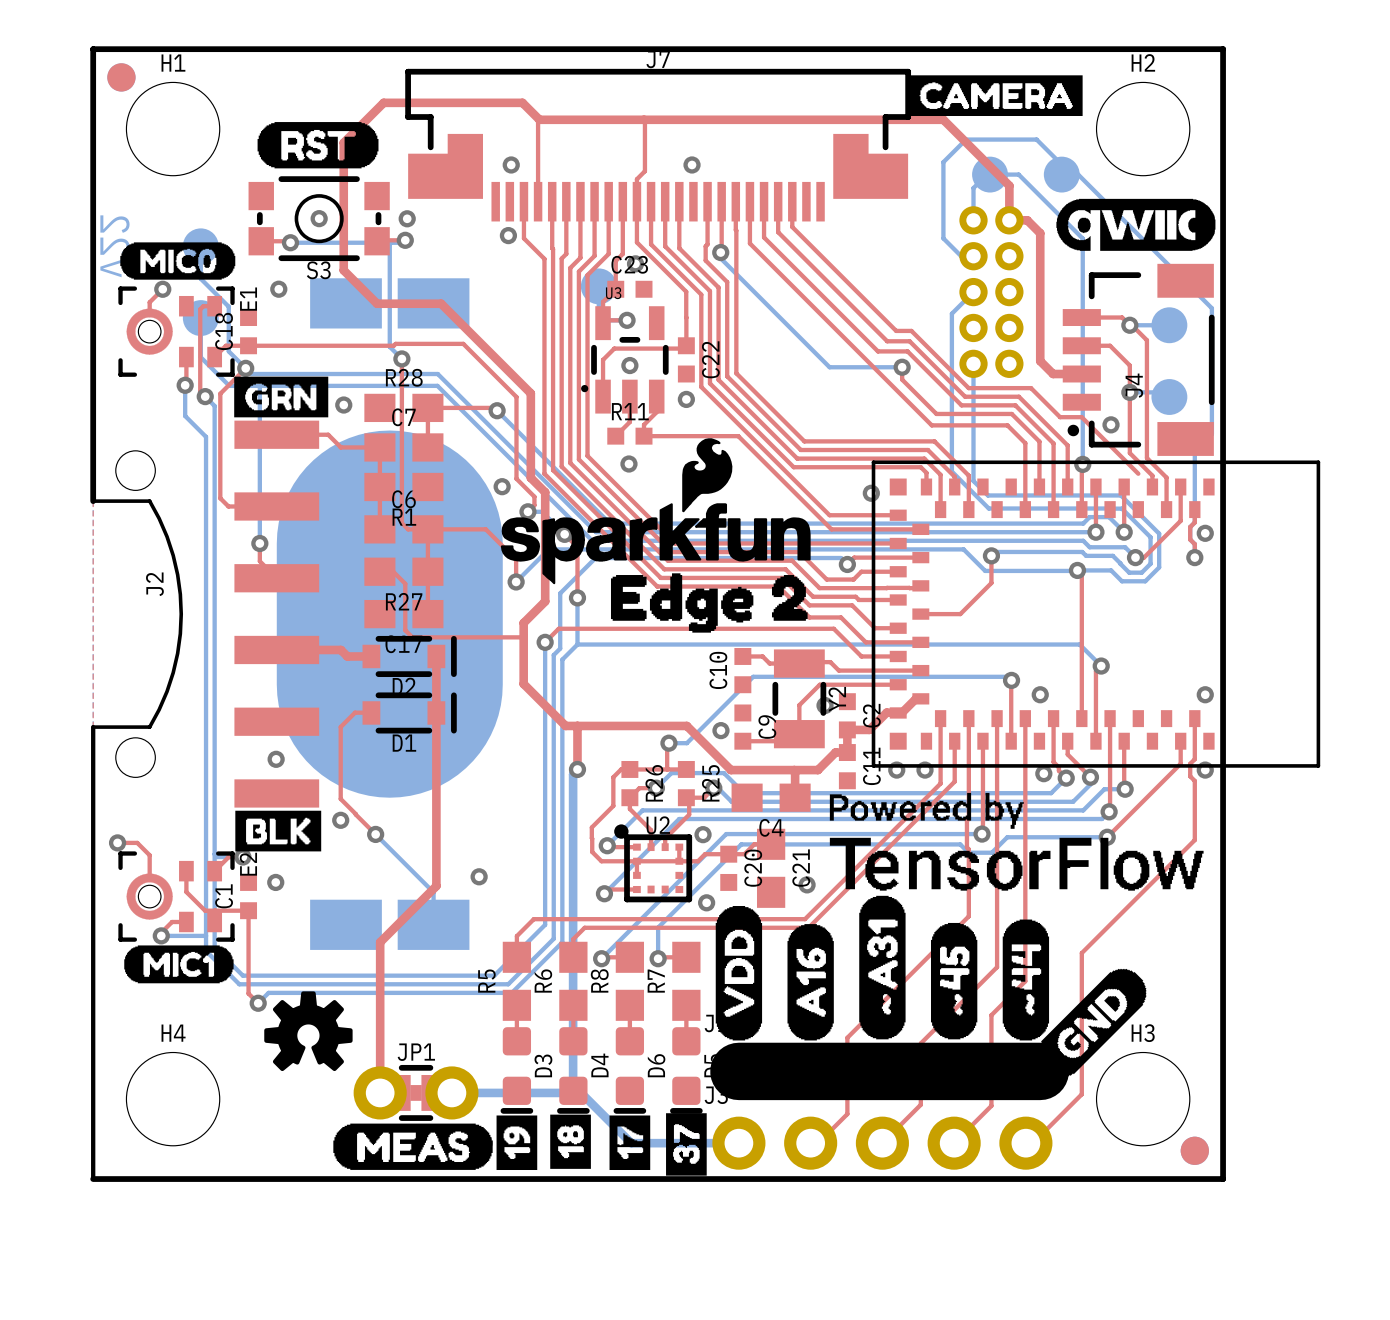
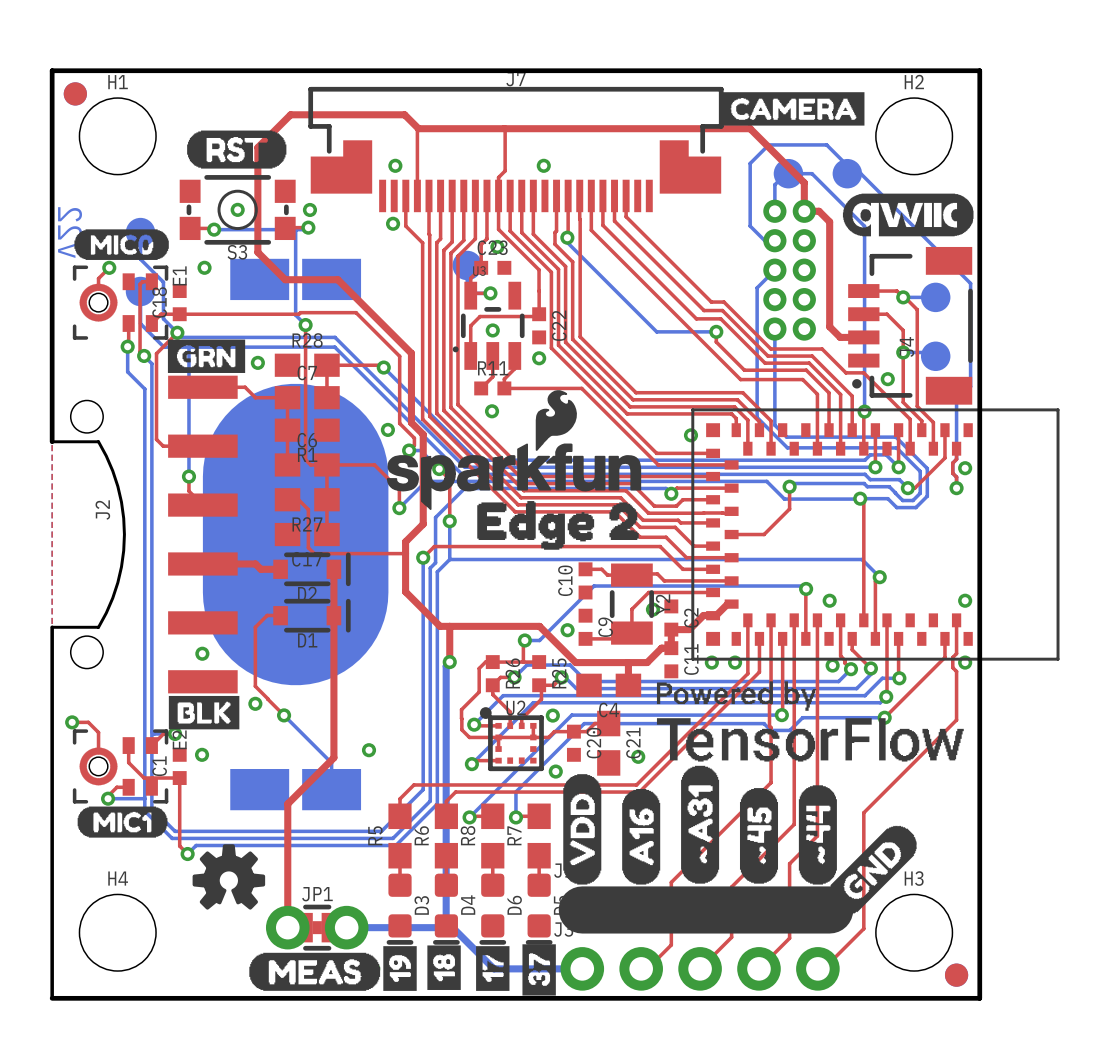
top track: none -> (910, 419) (910, 448)

